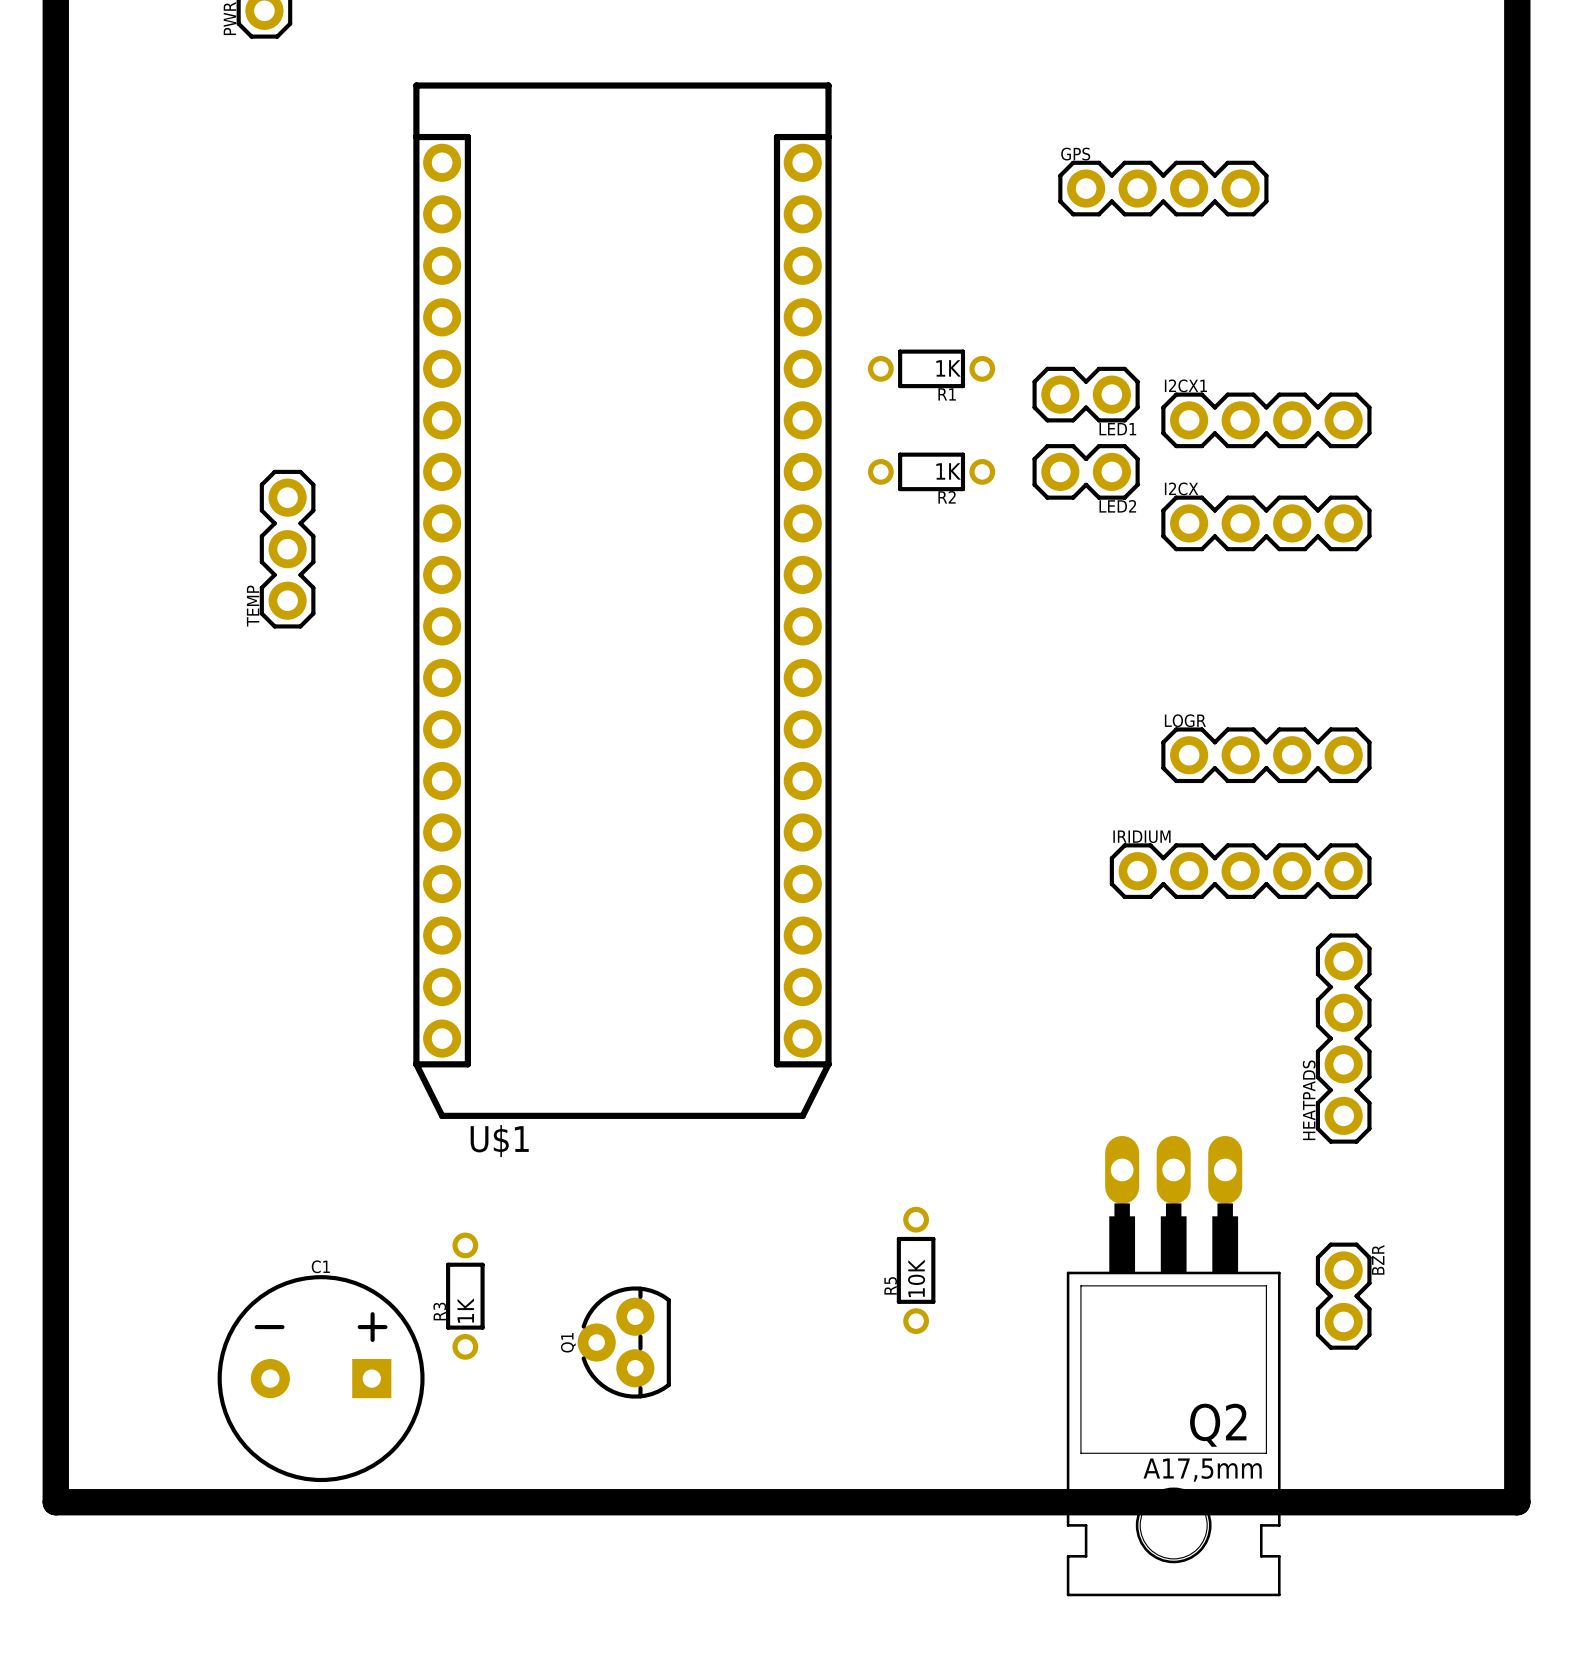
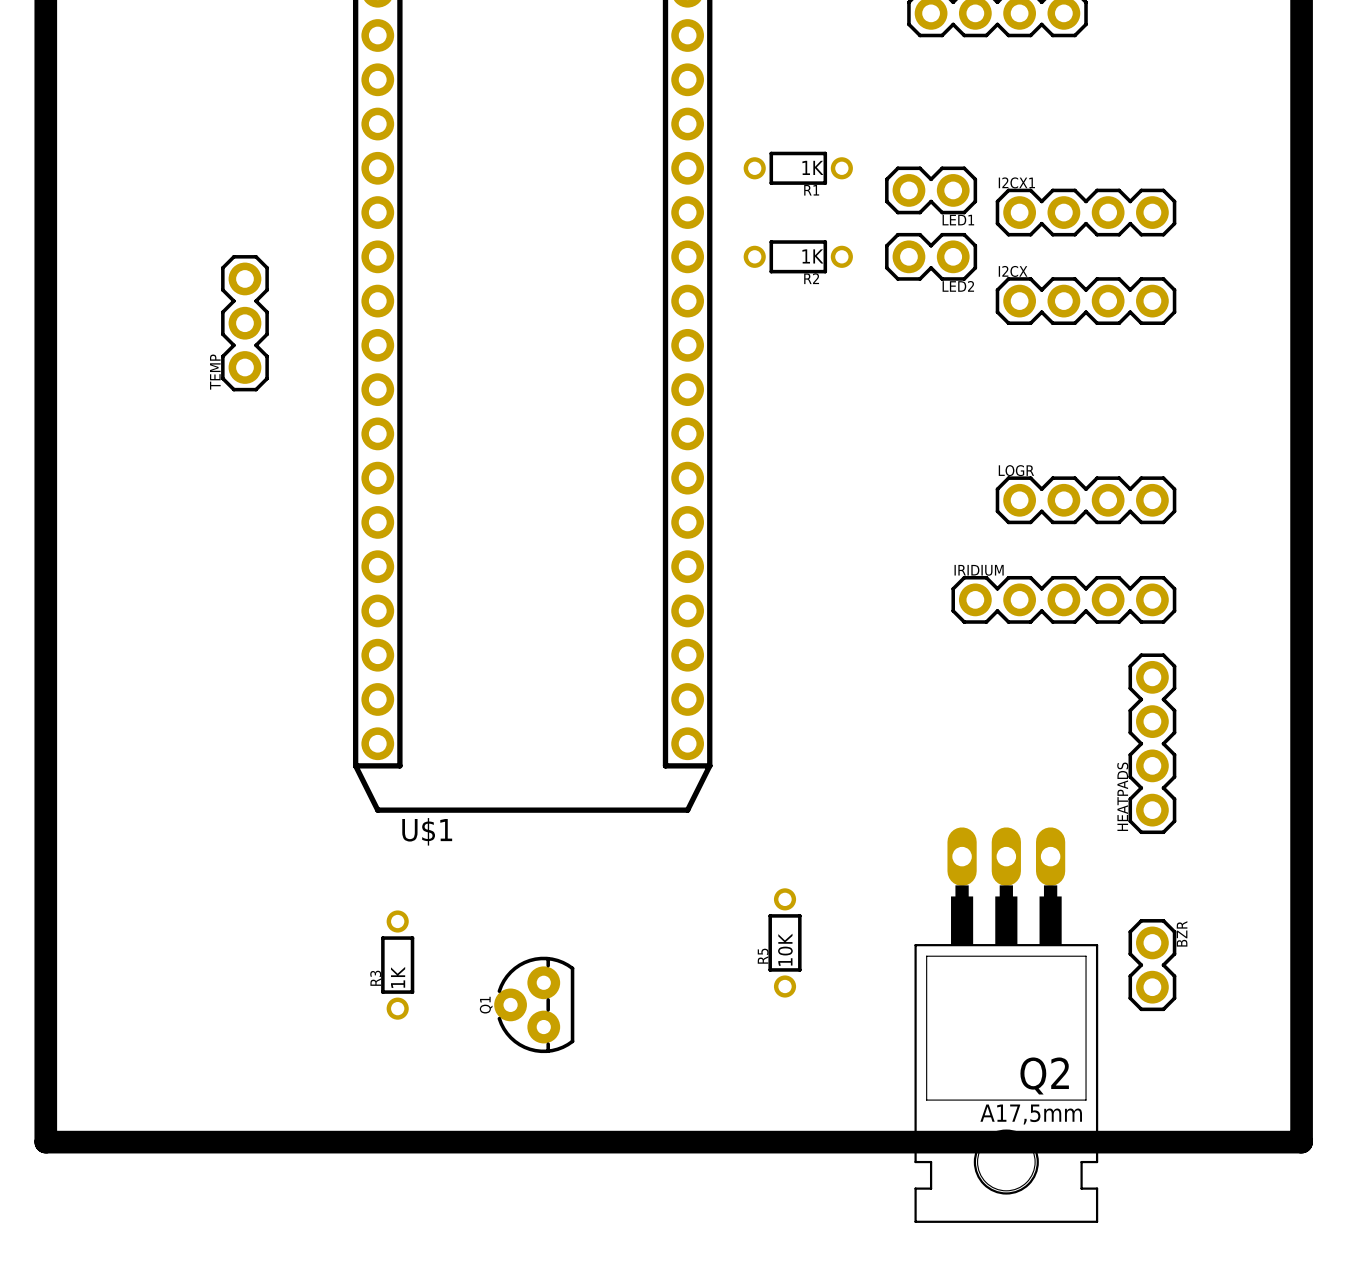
C1: (321, 1378) -> none

